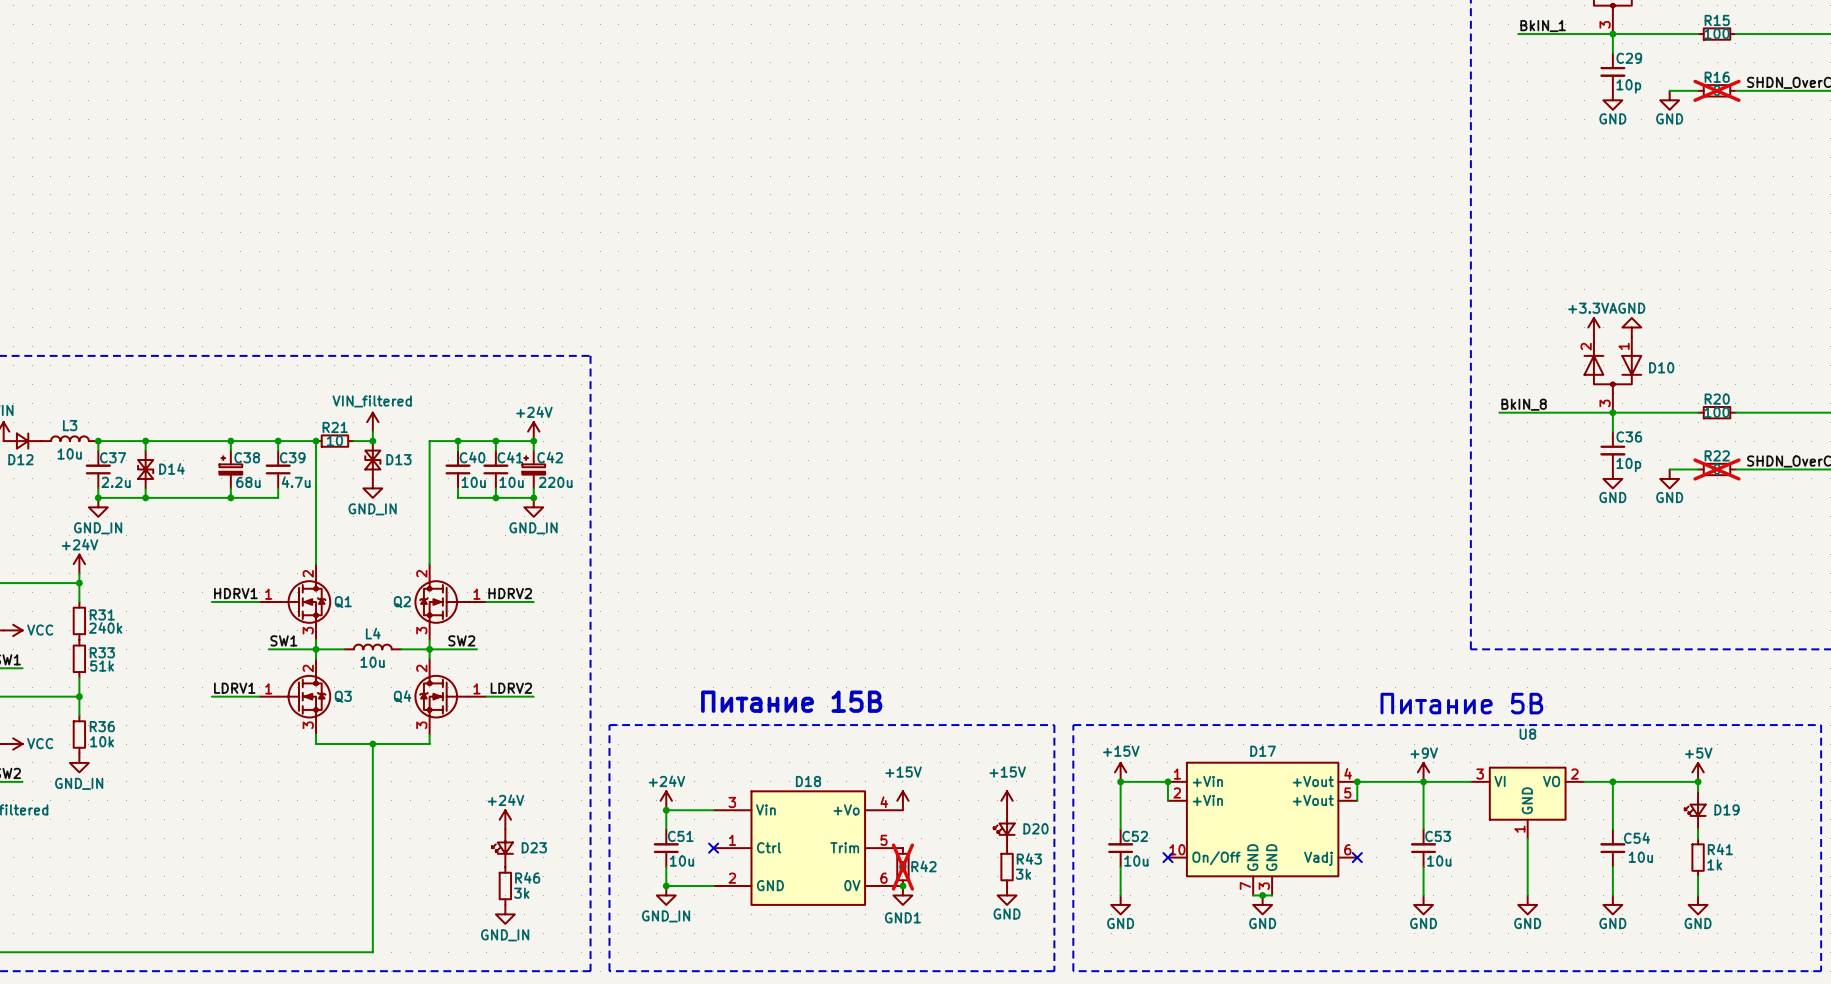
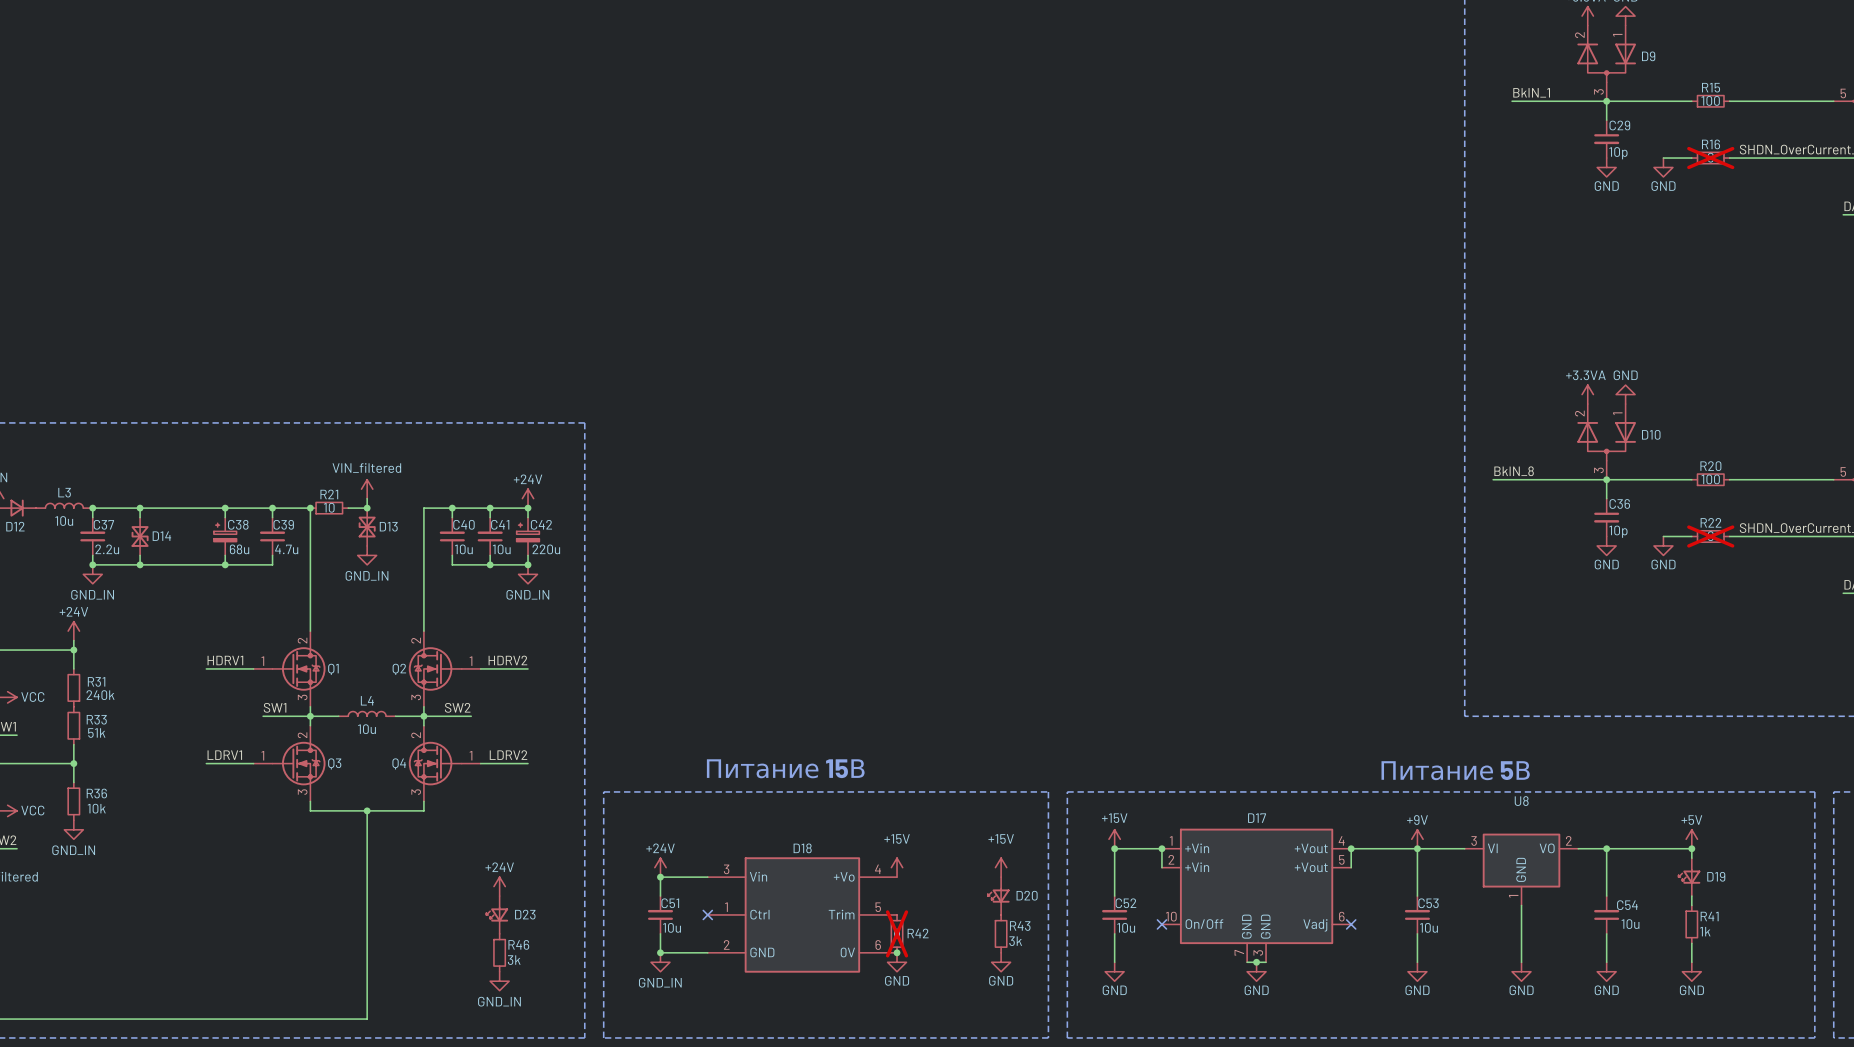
power symbol: GND1 (902, 895) -> GND (897, 962)

